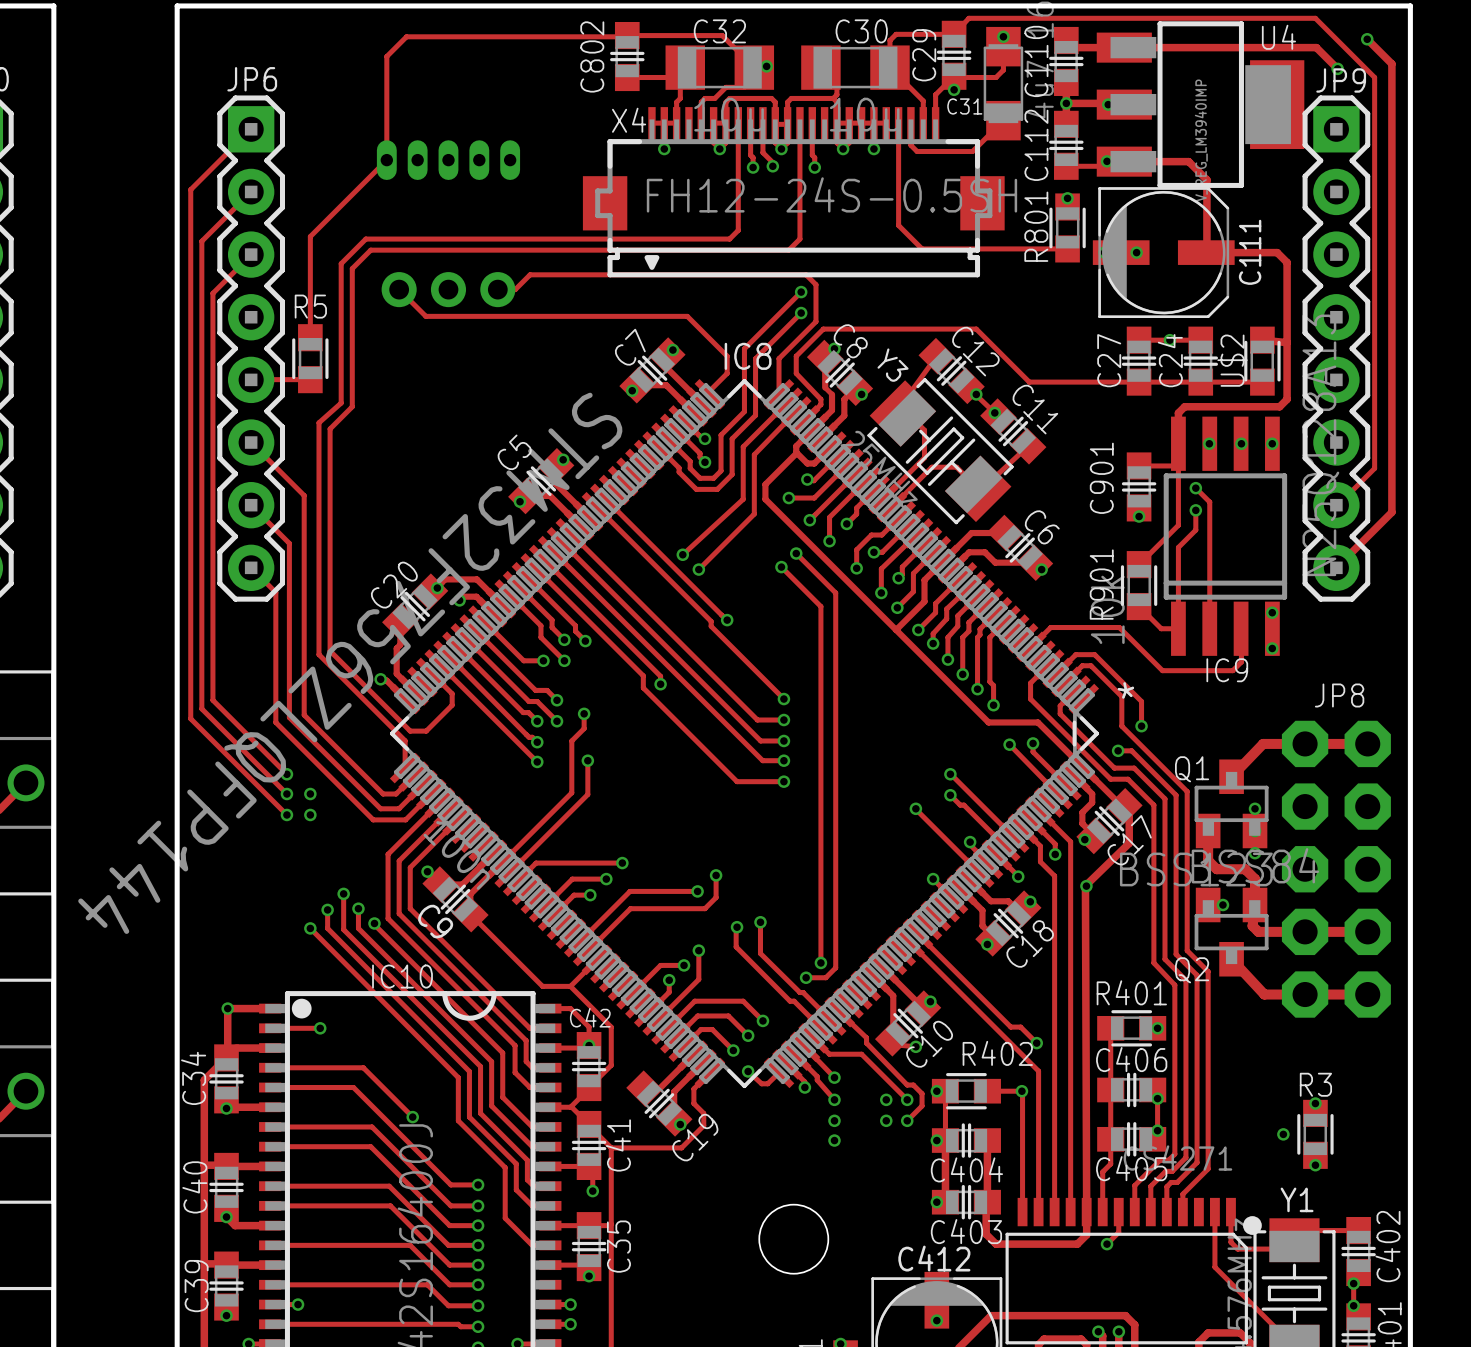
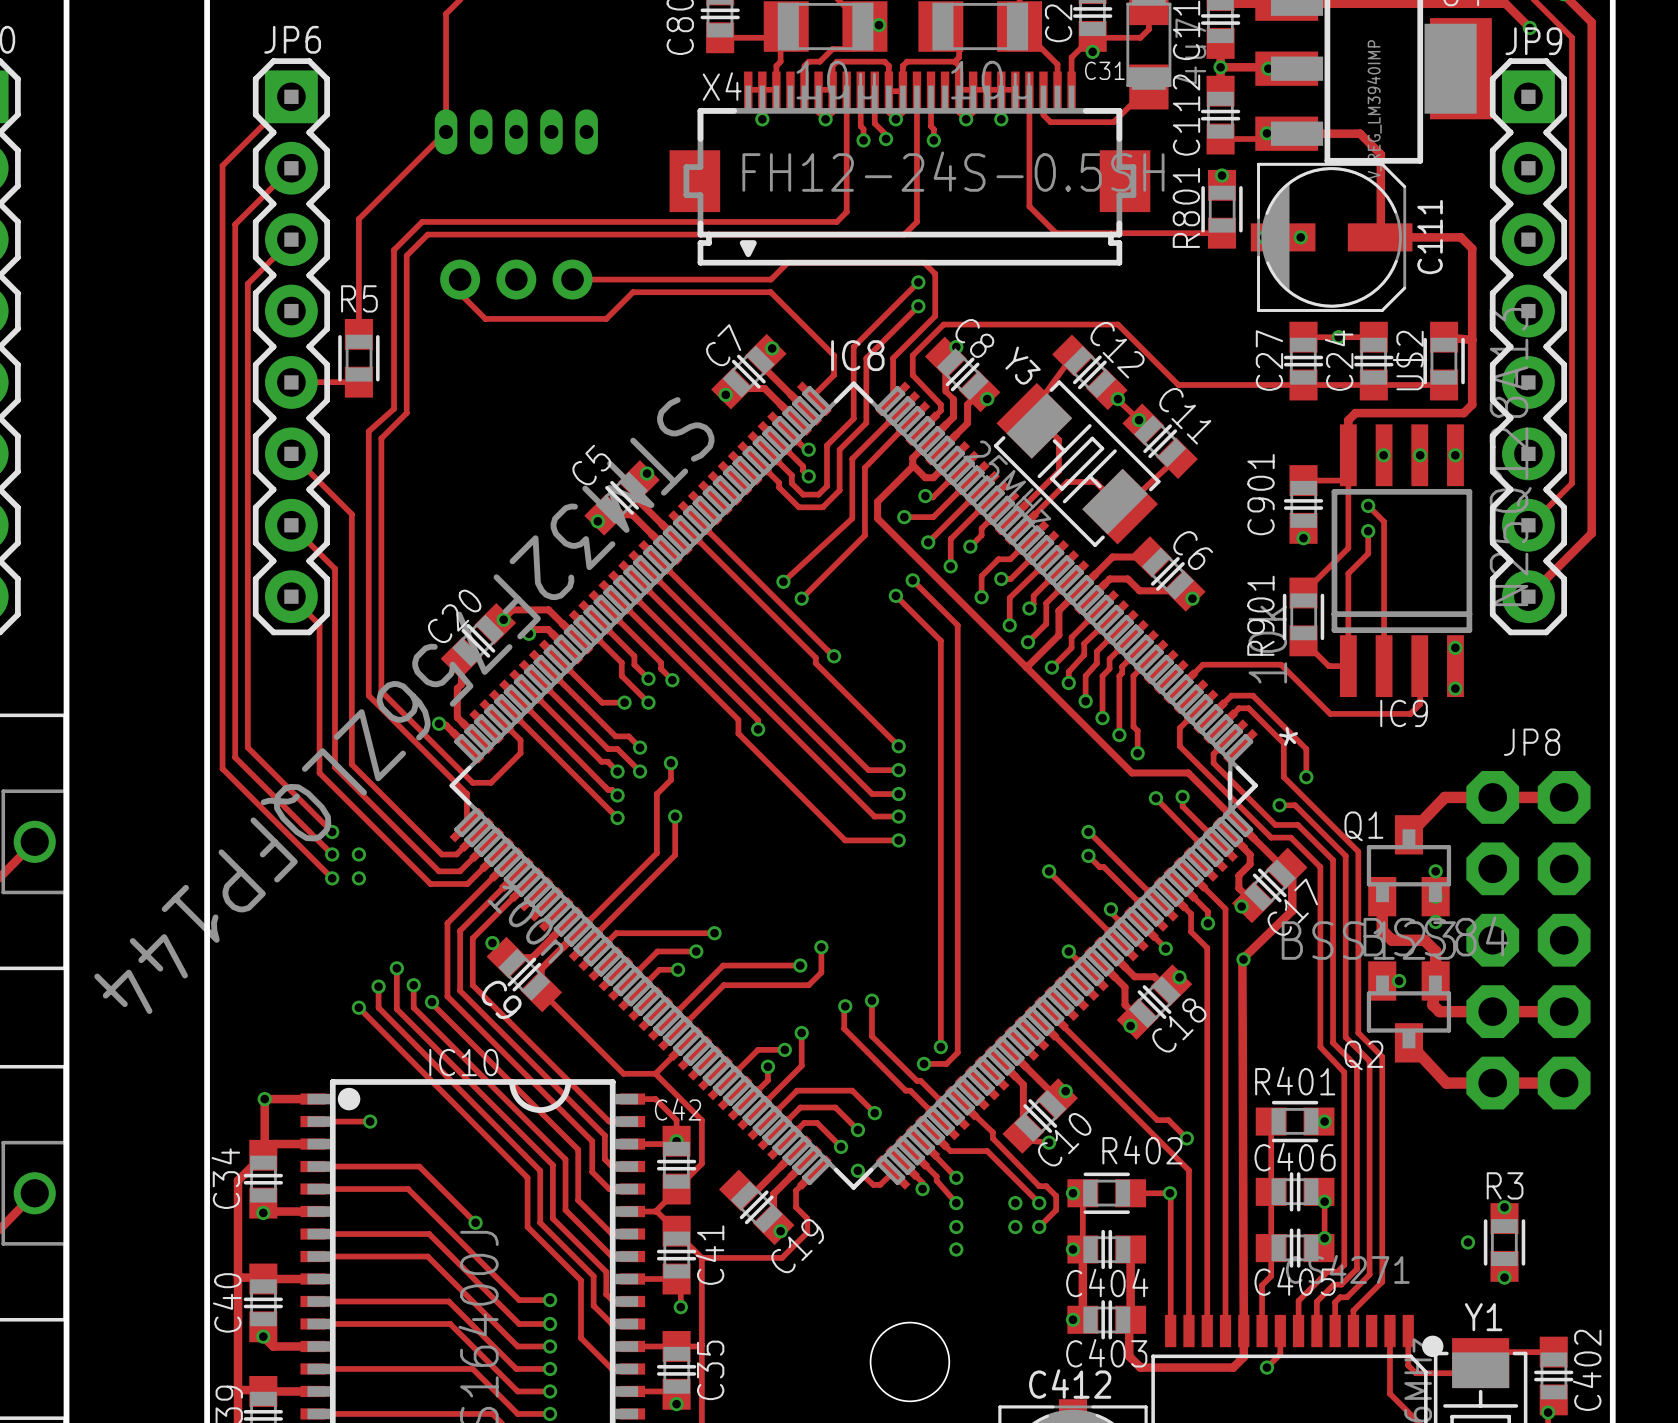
track: (686, 274) (530, 274) (515, 289) -> (787, 262) (771, 279) (592, 279)
track: (399, 289) (425, 316) (687, 316) -> (444, 279) (485, 318) (606, 318) (633, 292) (770, 292) (788, 310)

